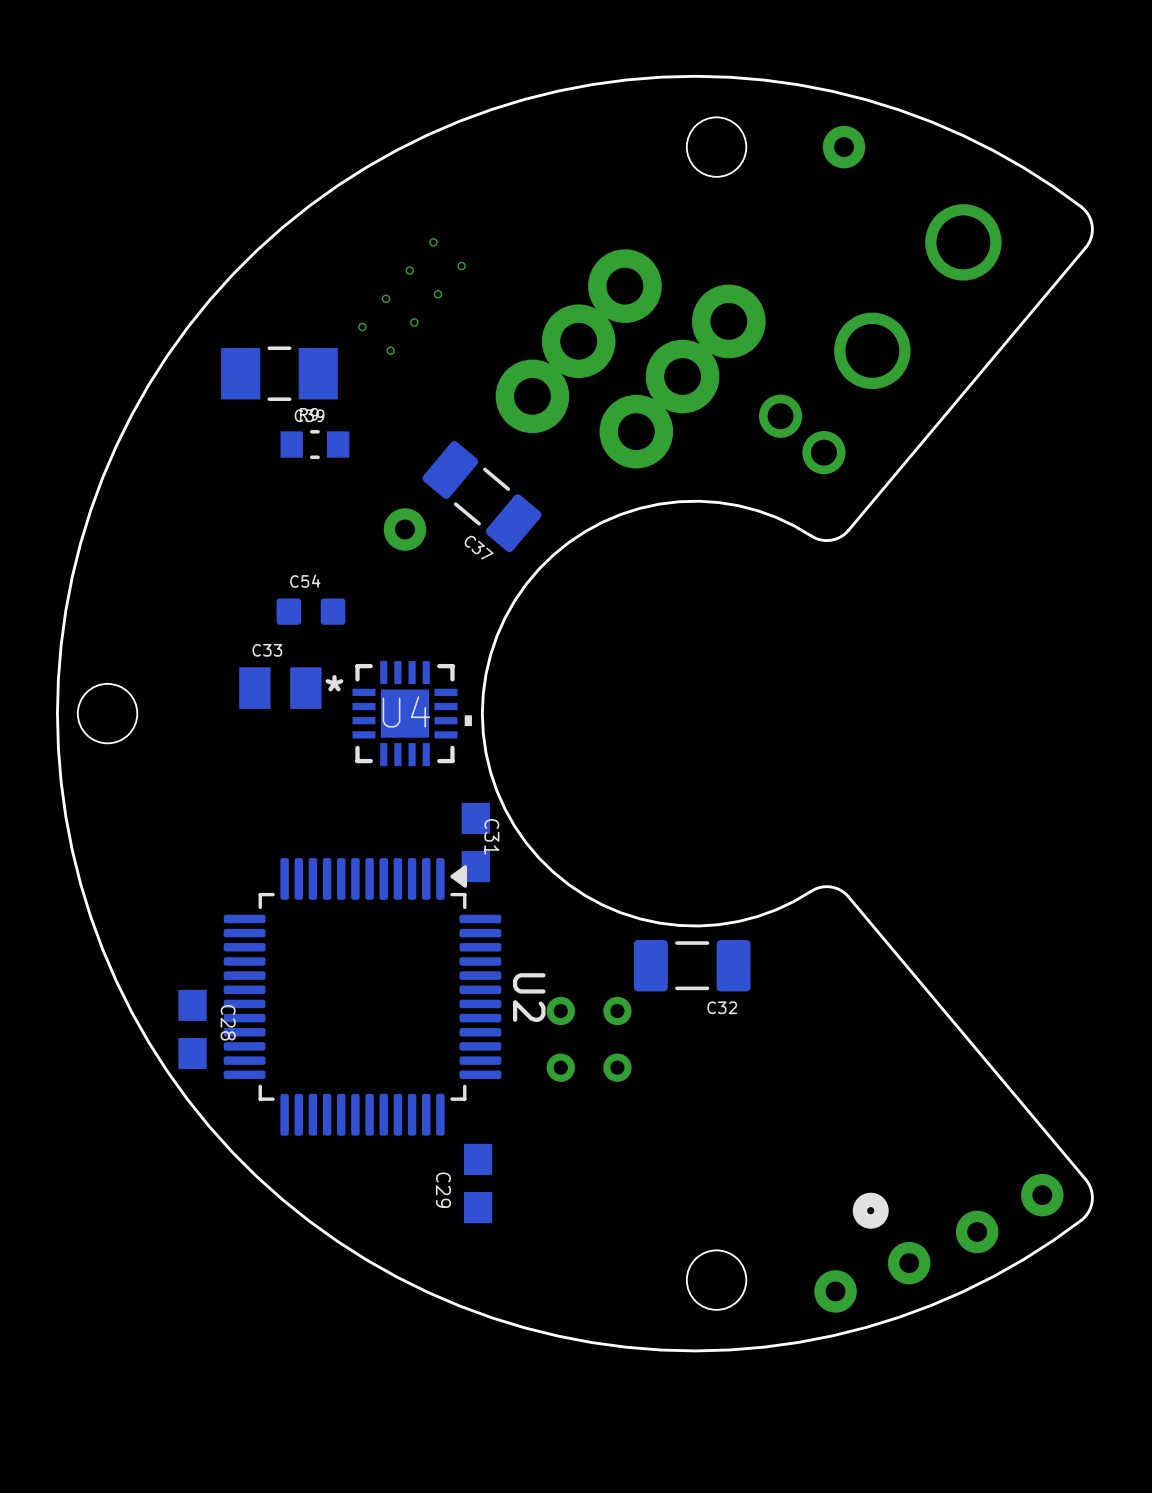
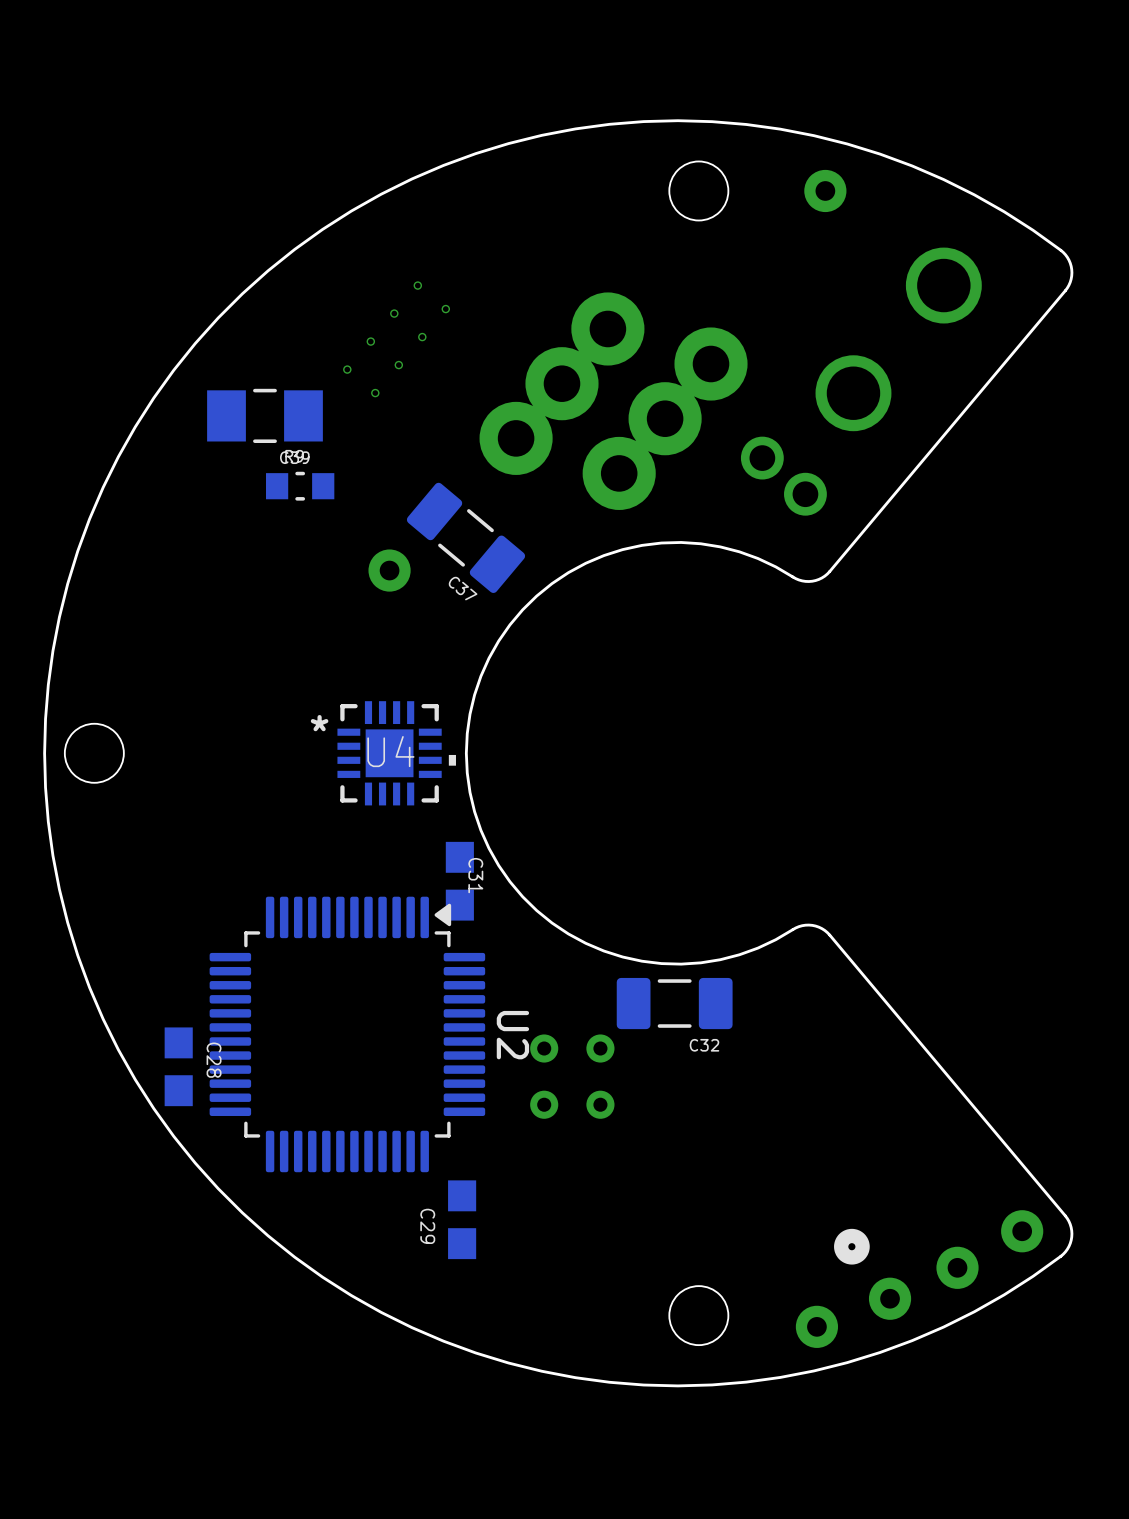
C54: (310, 611) -> none
C33: (280, 688) -> none

